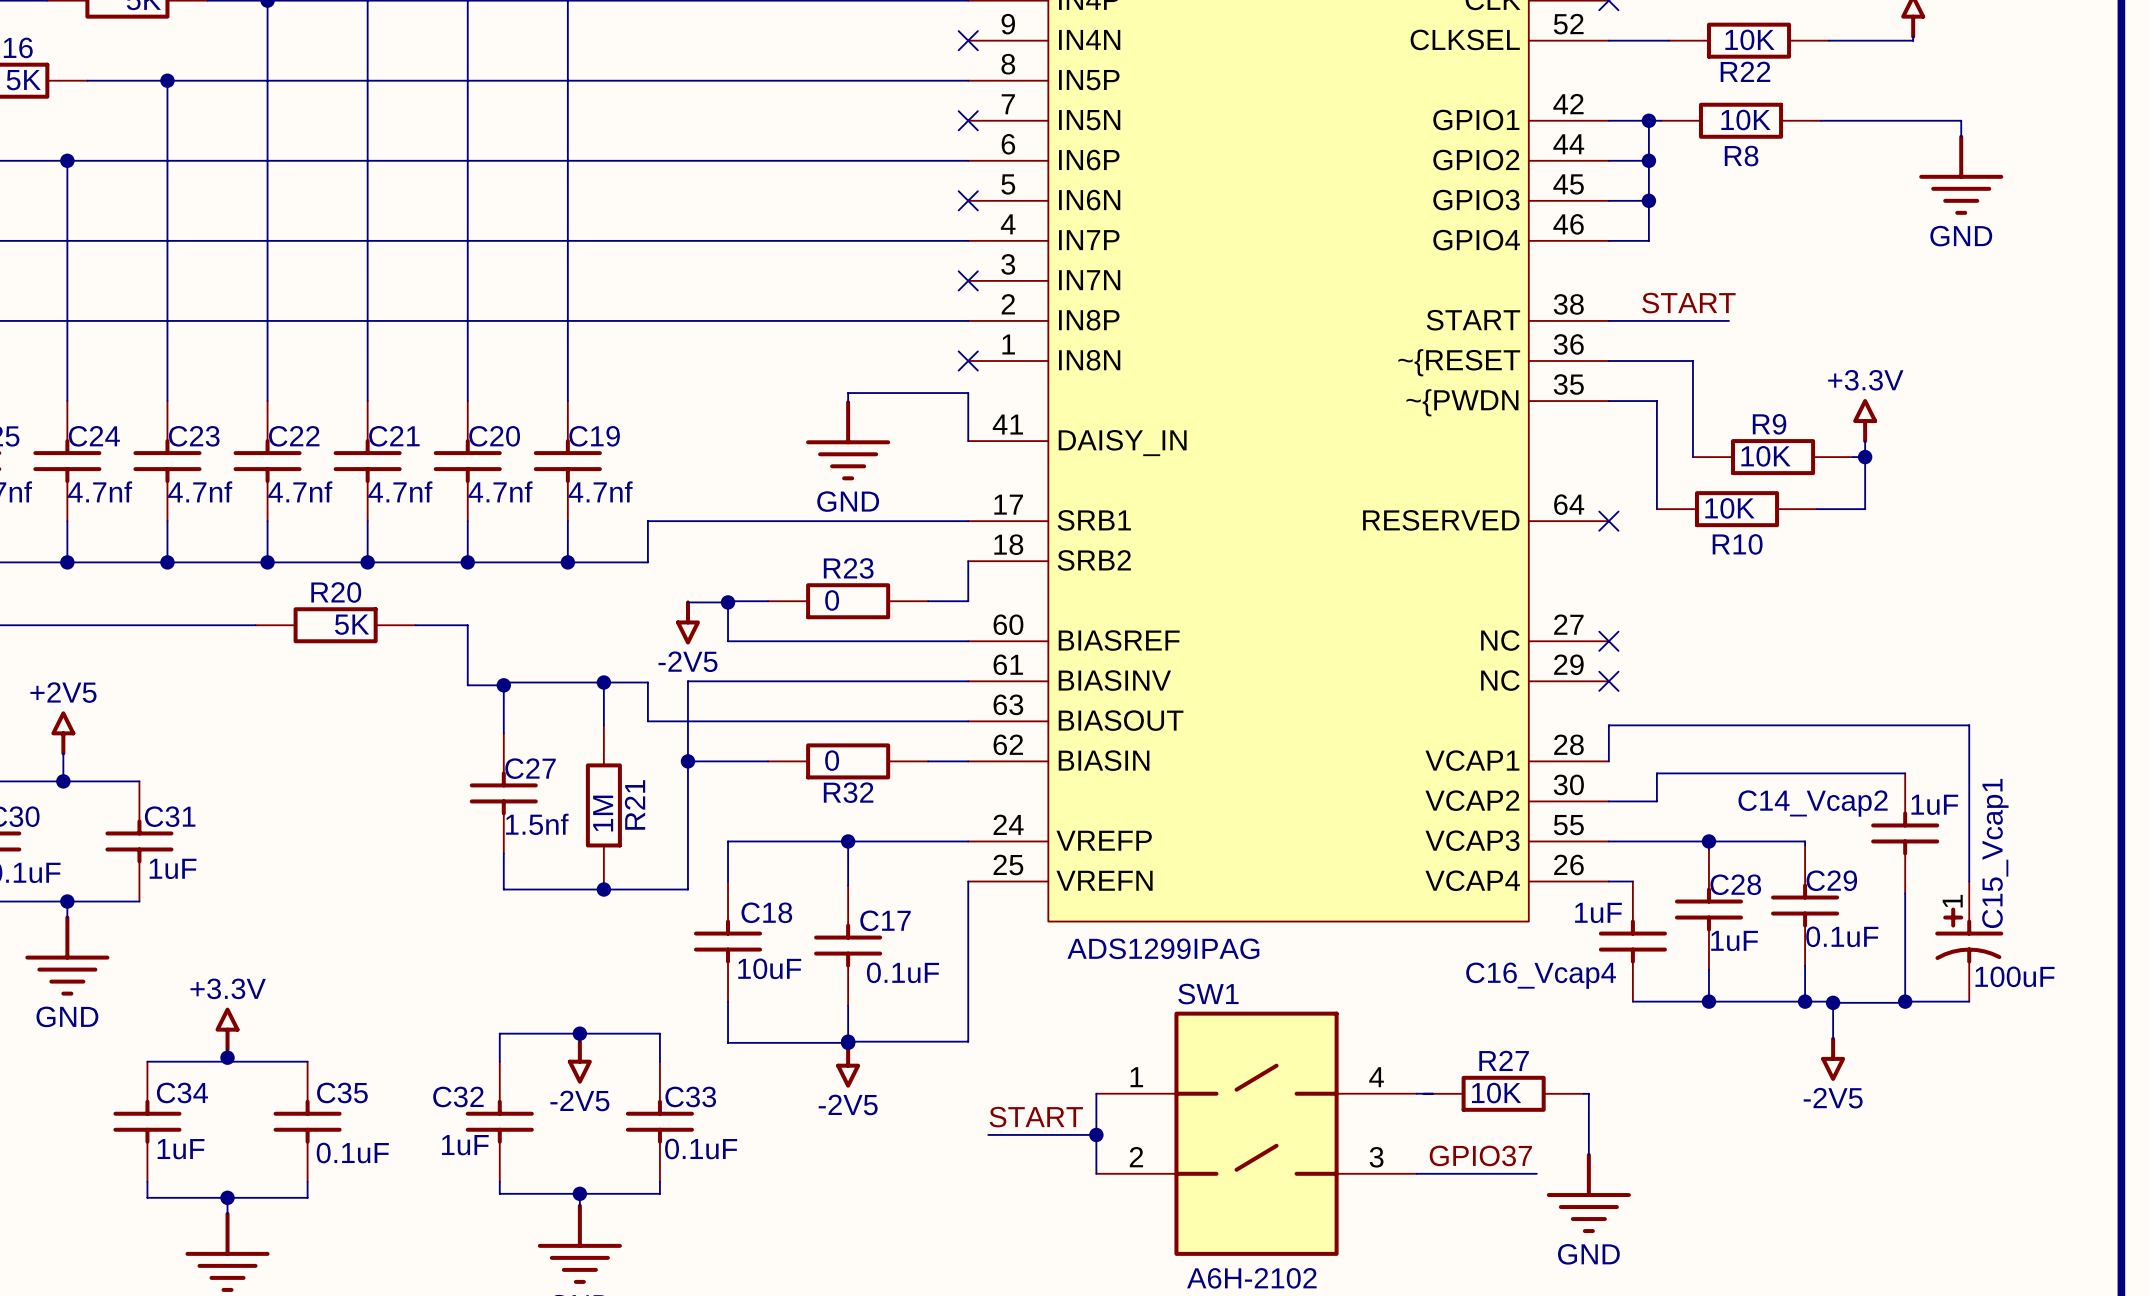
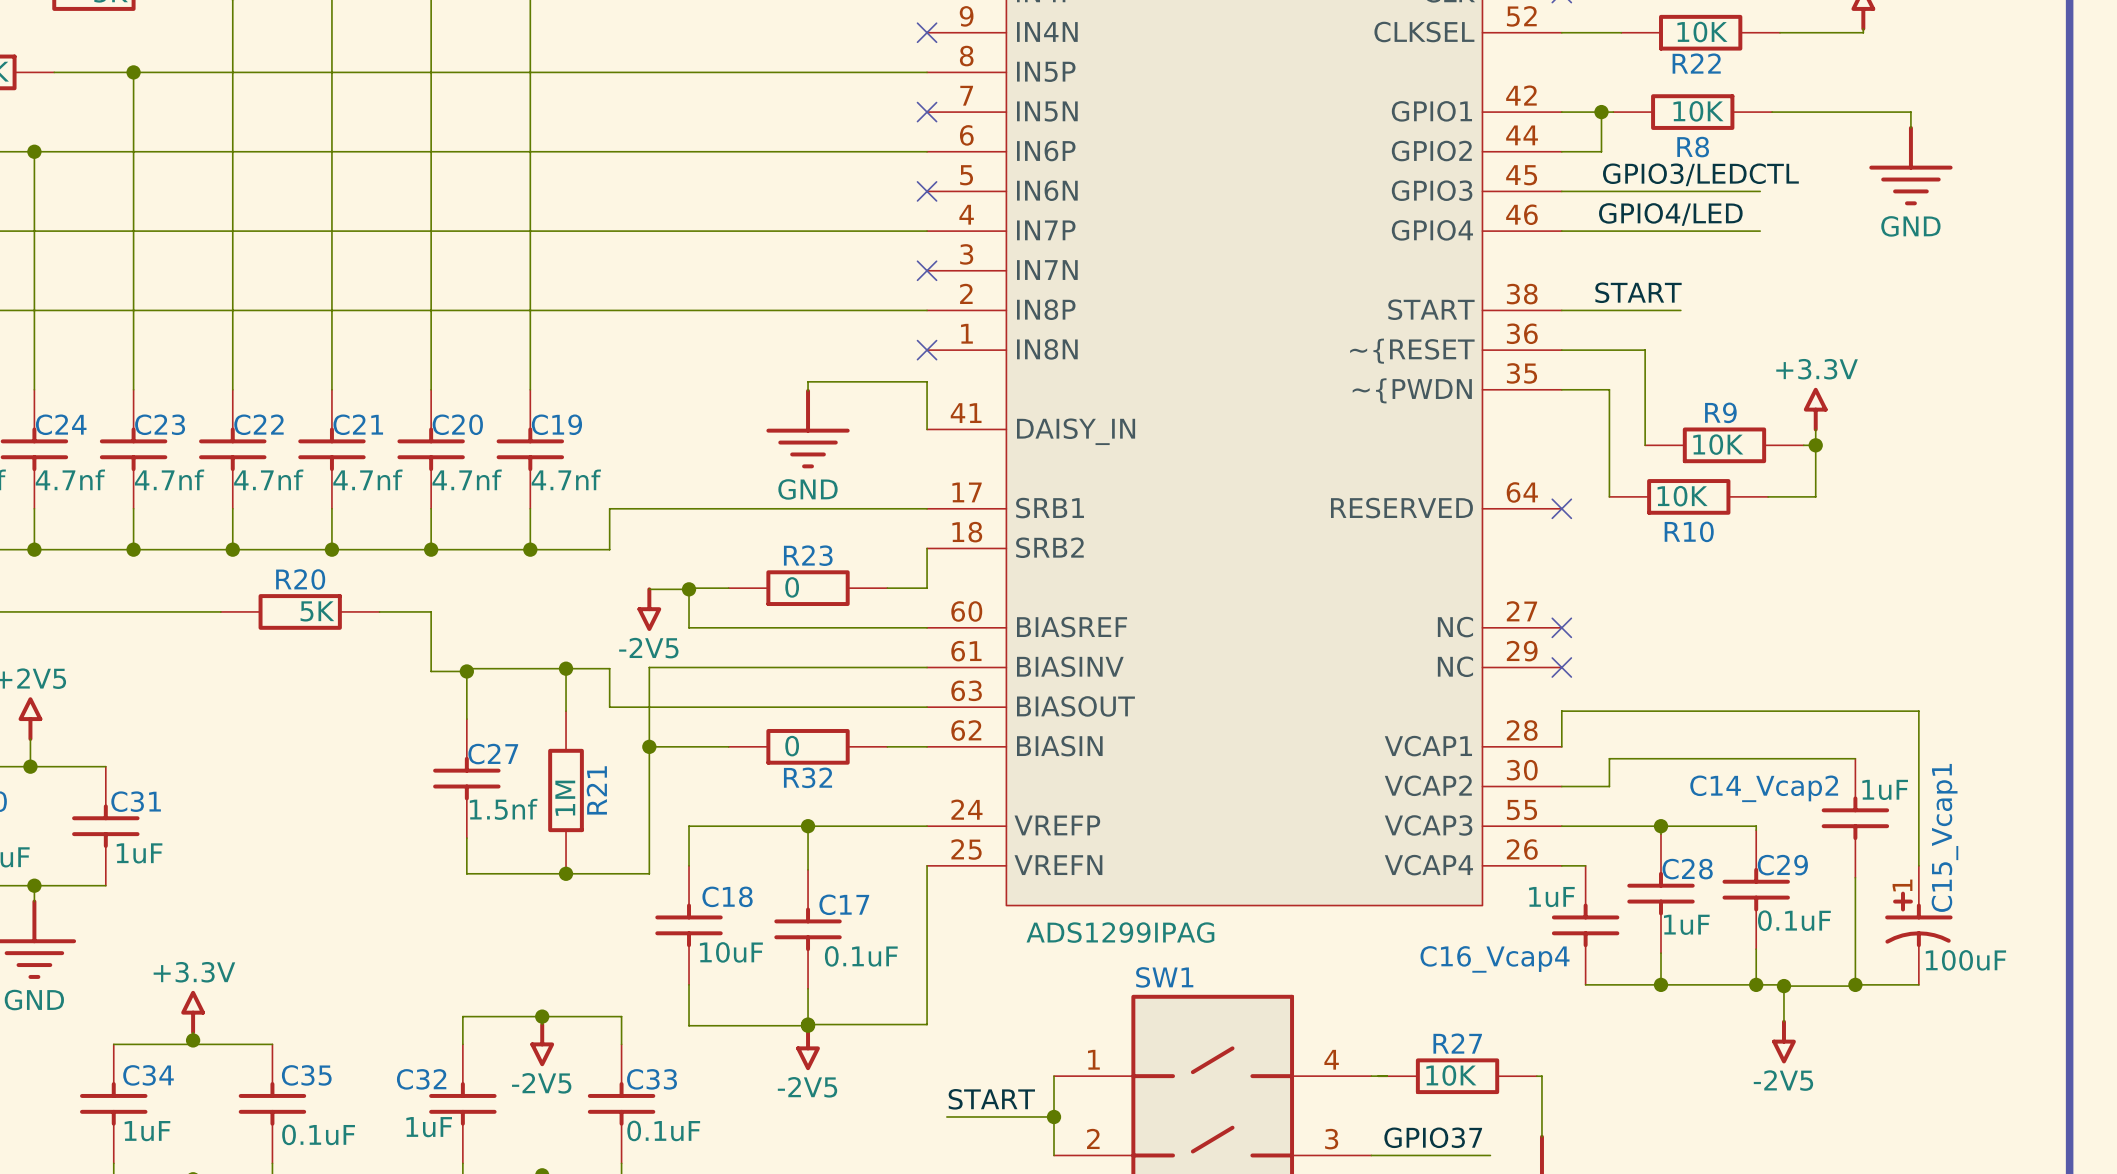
wire: (1648, 160) (1648, 240) -> (1760, 231) (1601, 231)
junction: (1648, 160) -> none
label: none -> GPIO3/LEDCTL (1700, 174)
wire: none -> (1601, 191) (1760, 191)
junction: (1648, 200) -> none
label: none -> GPIO4/LED (1670, 214)

